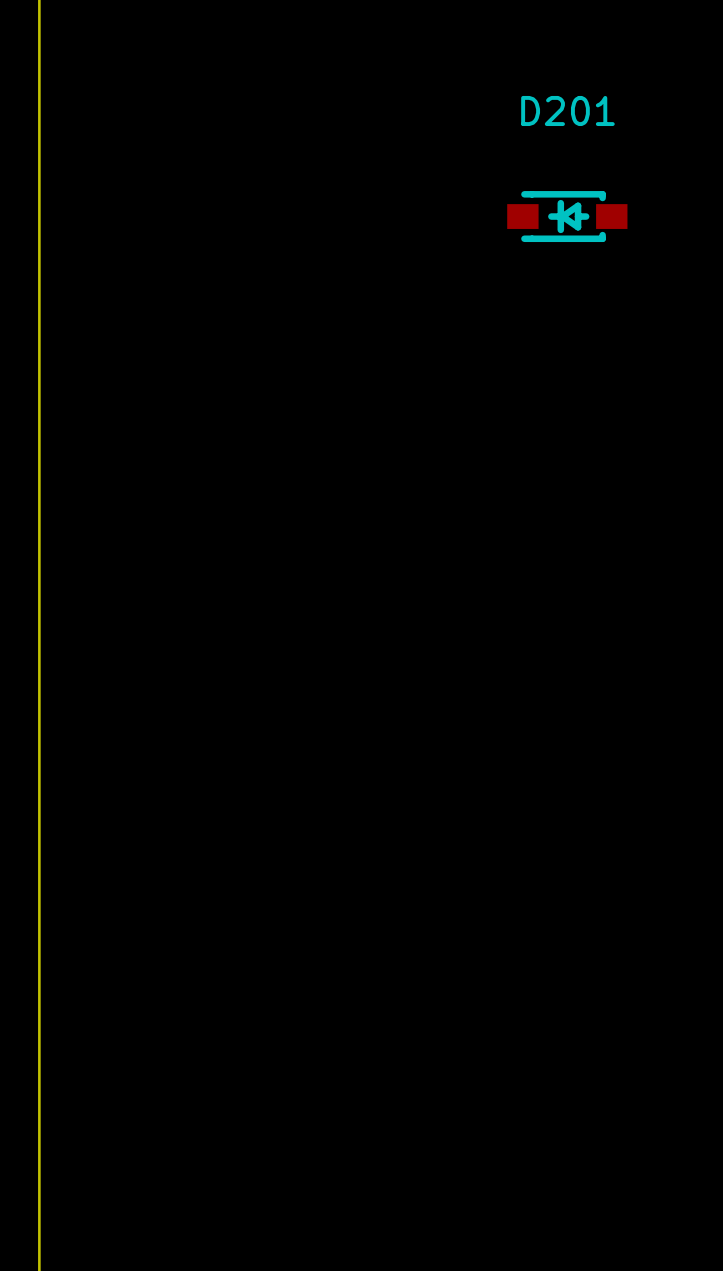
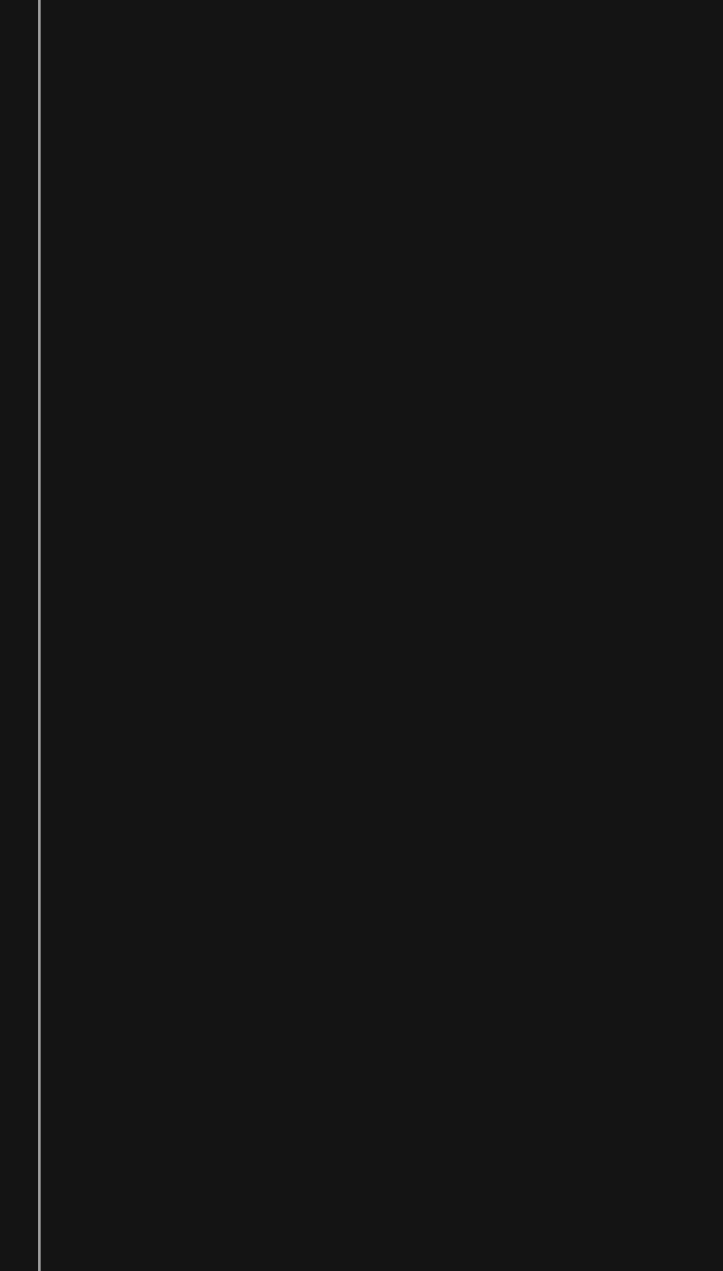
D201: (567, 216) -> none

